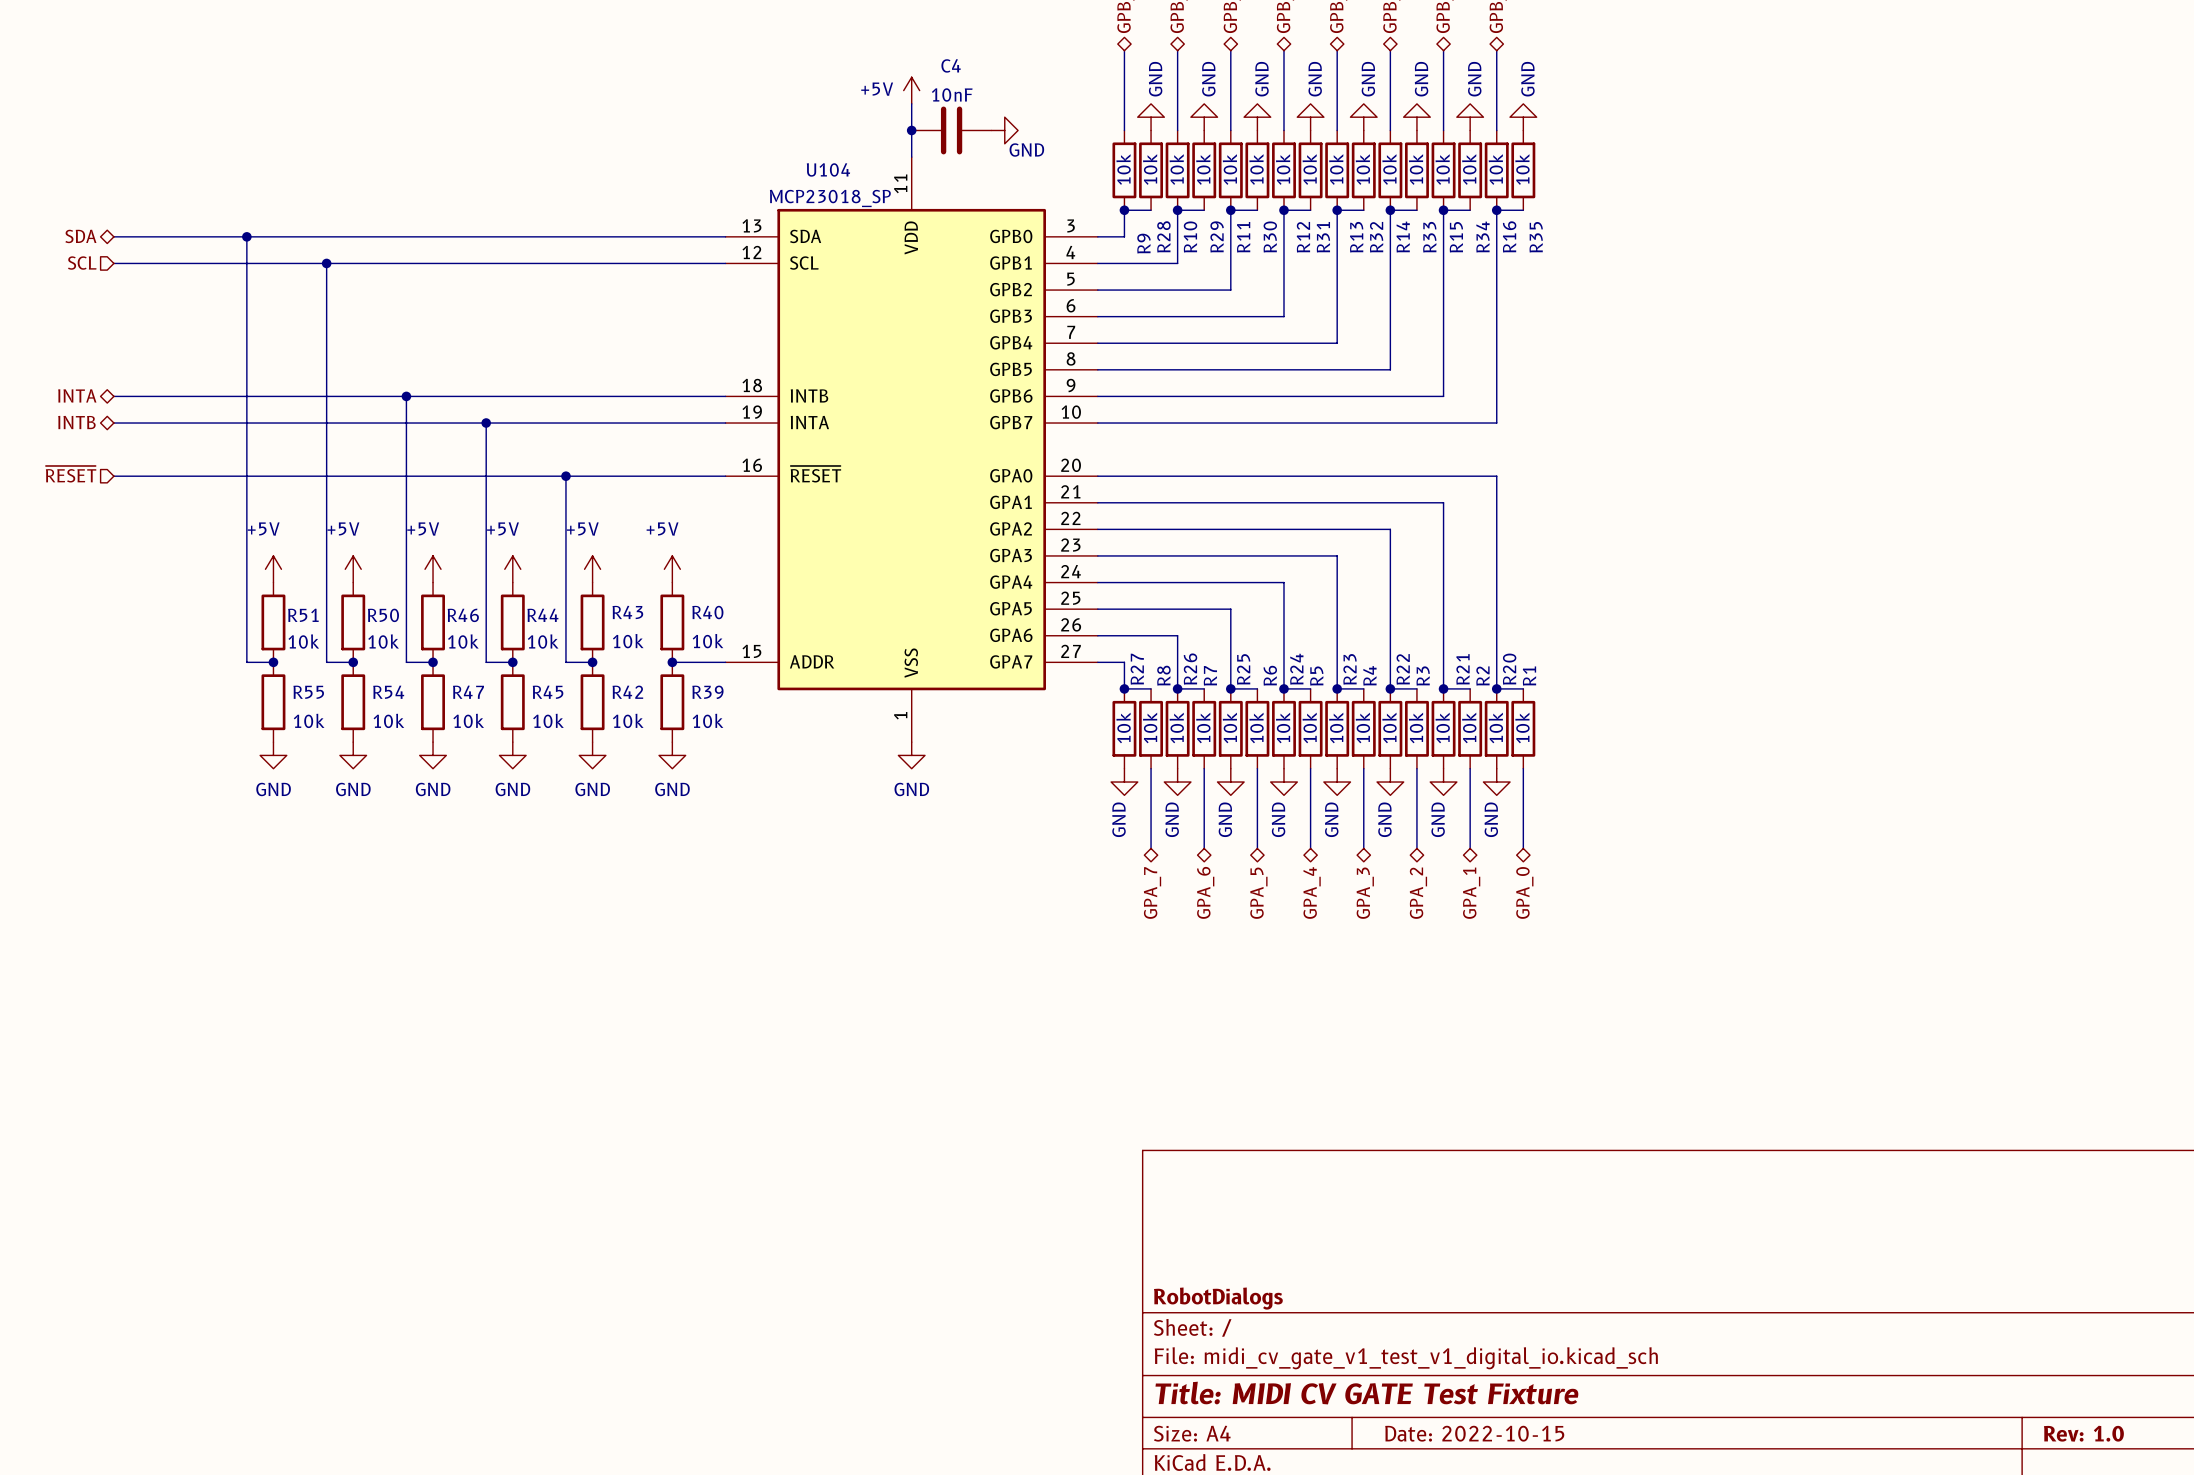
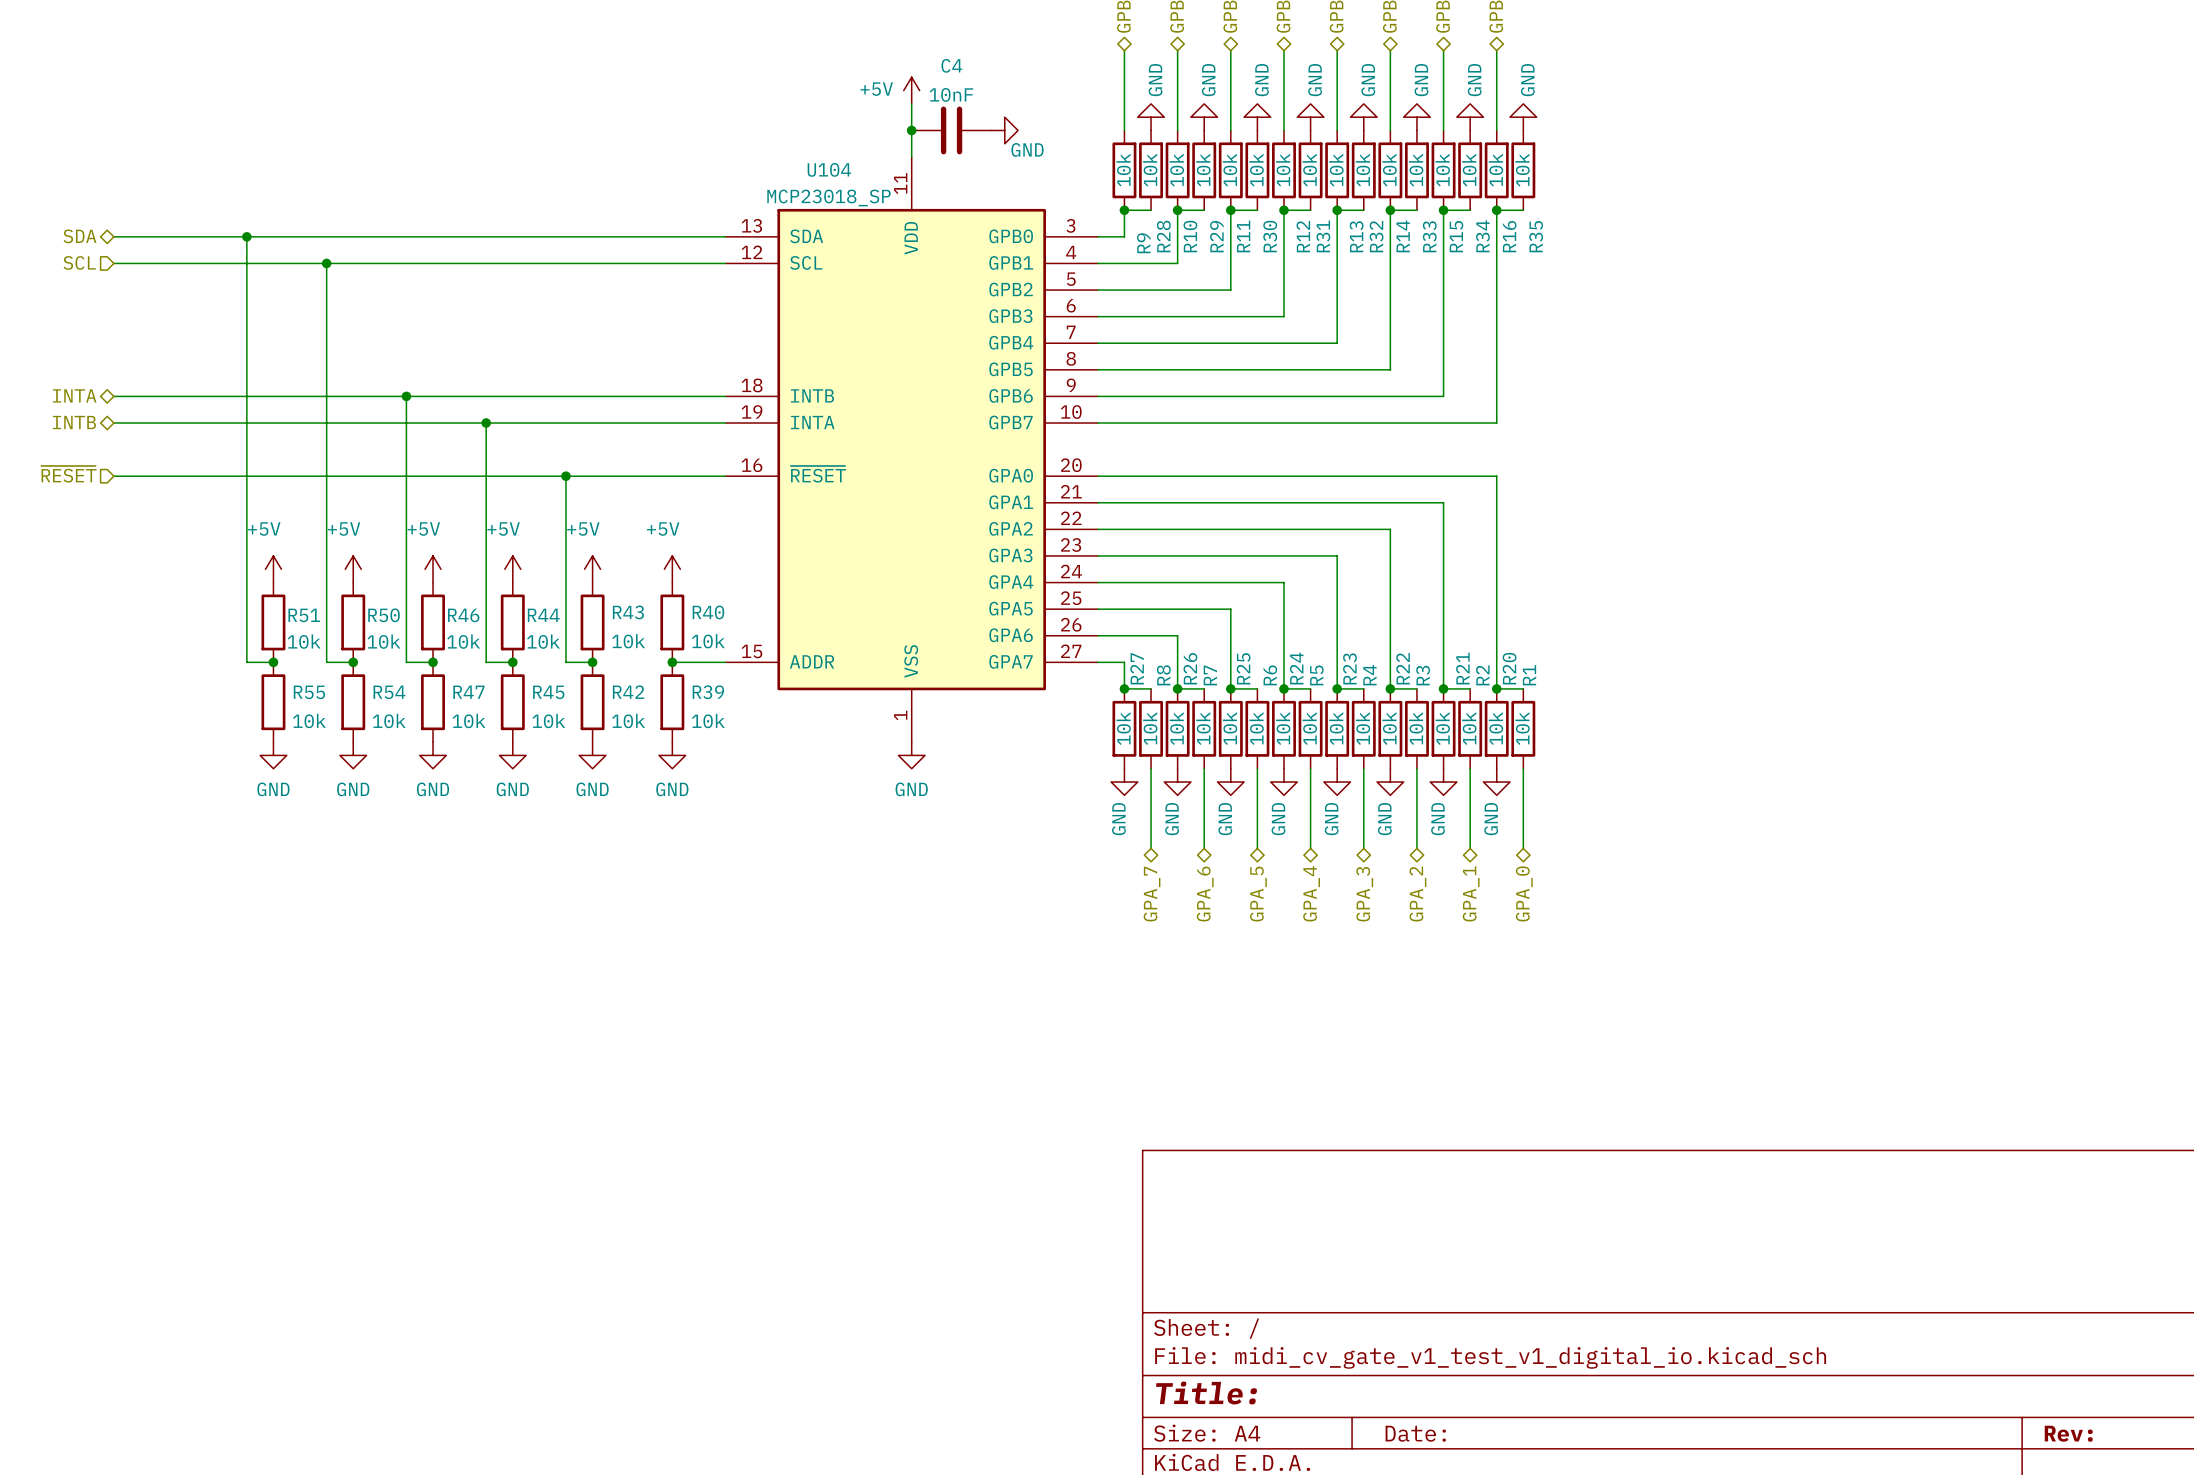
title block: RobotDialogs (1218, 1298) -> none
title block: Title: MIDI CV GATE Test Fixture (1366, 1393) -> Title: (1206, 1392)
title block: Date: 2022-10-15 (1474, 1433) -> Date: (1415, 1433)
title block: Rev: 1.0 (2083, 1433) -> Rev: (2068, 1433)

